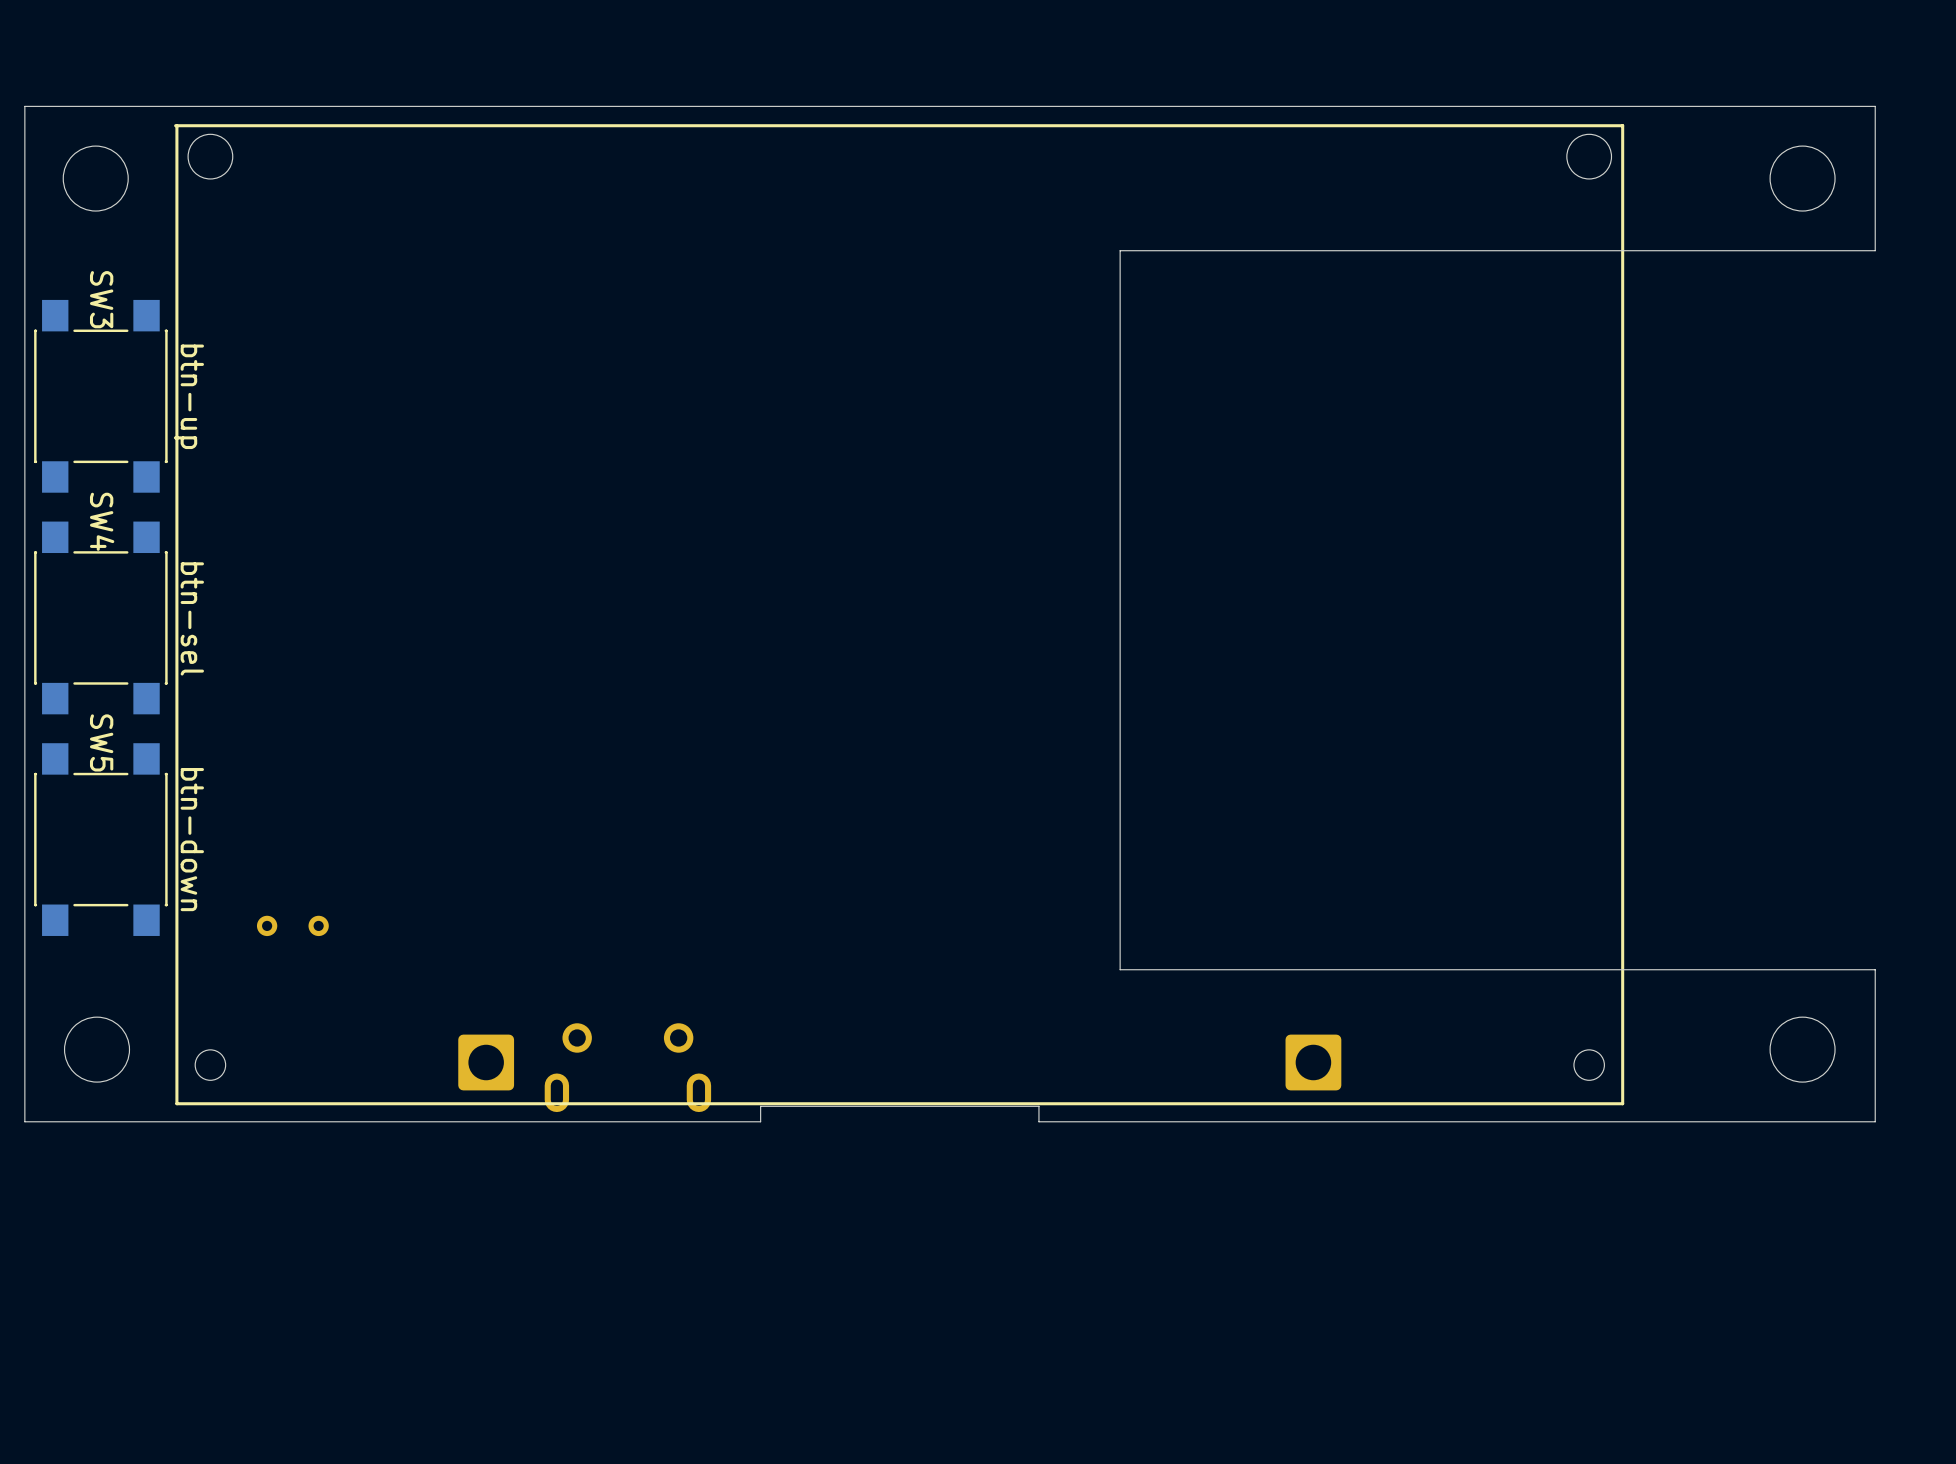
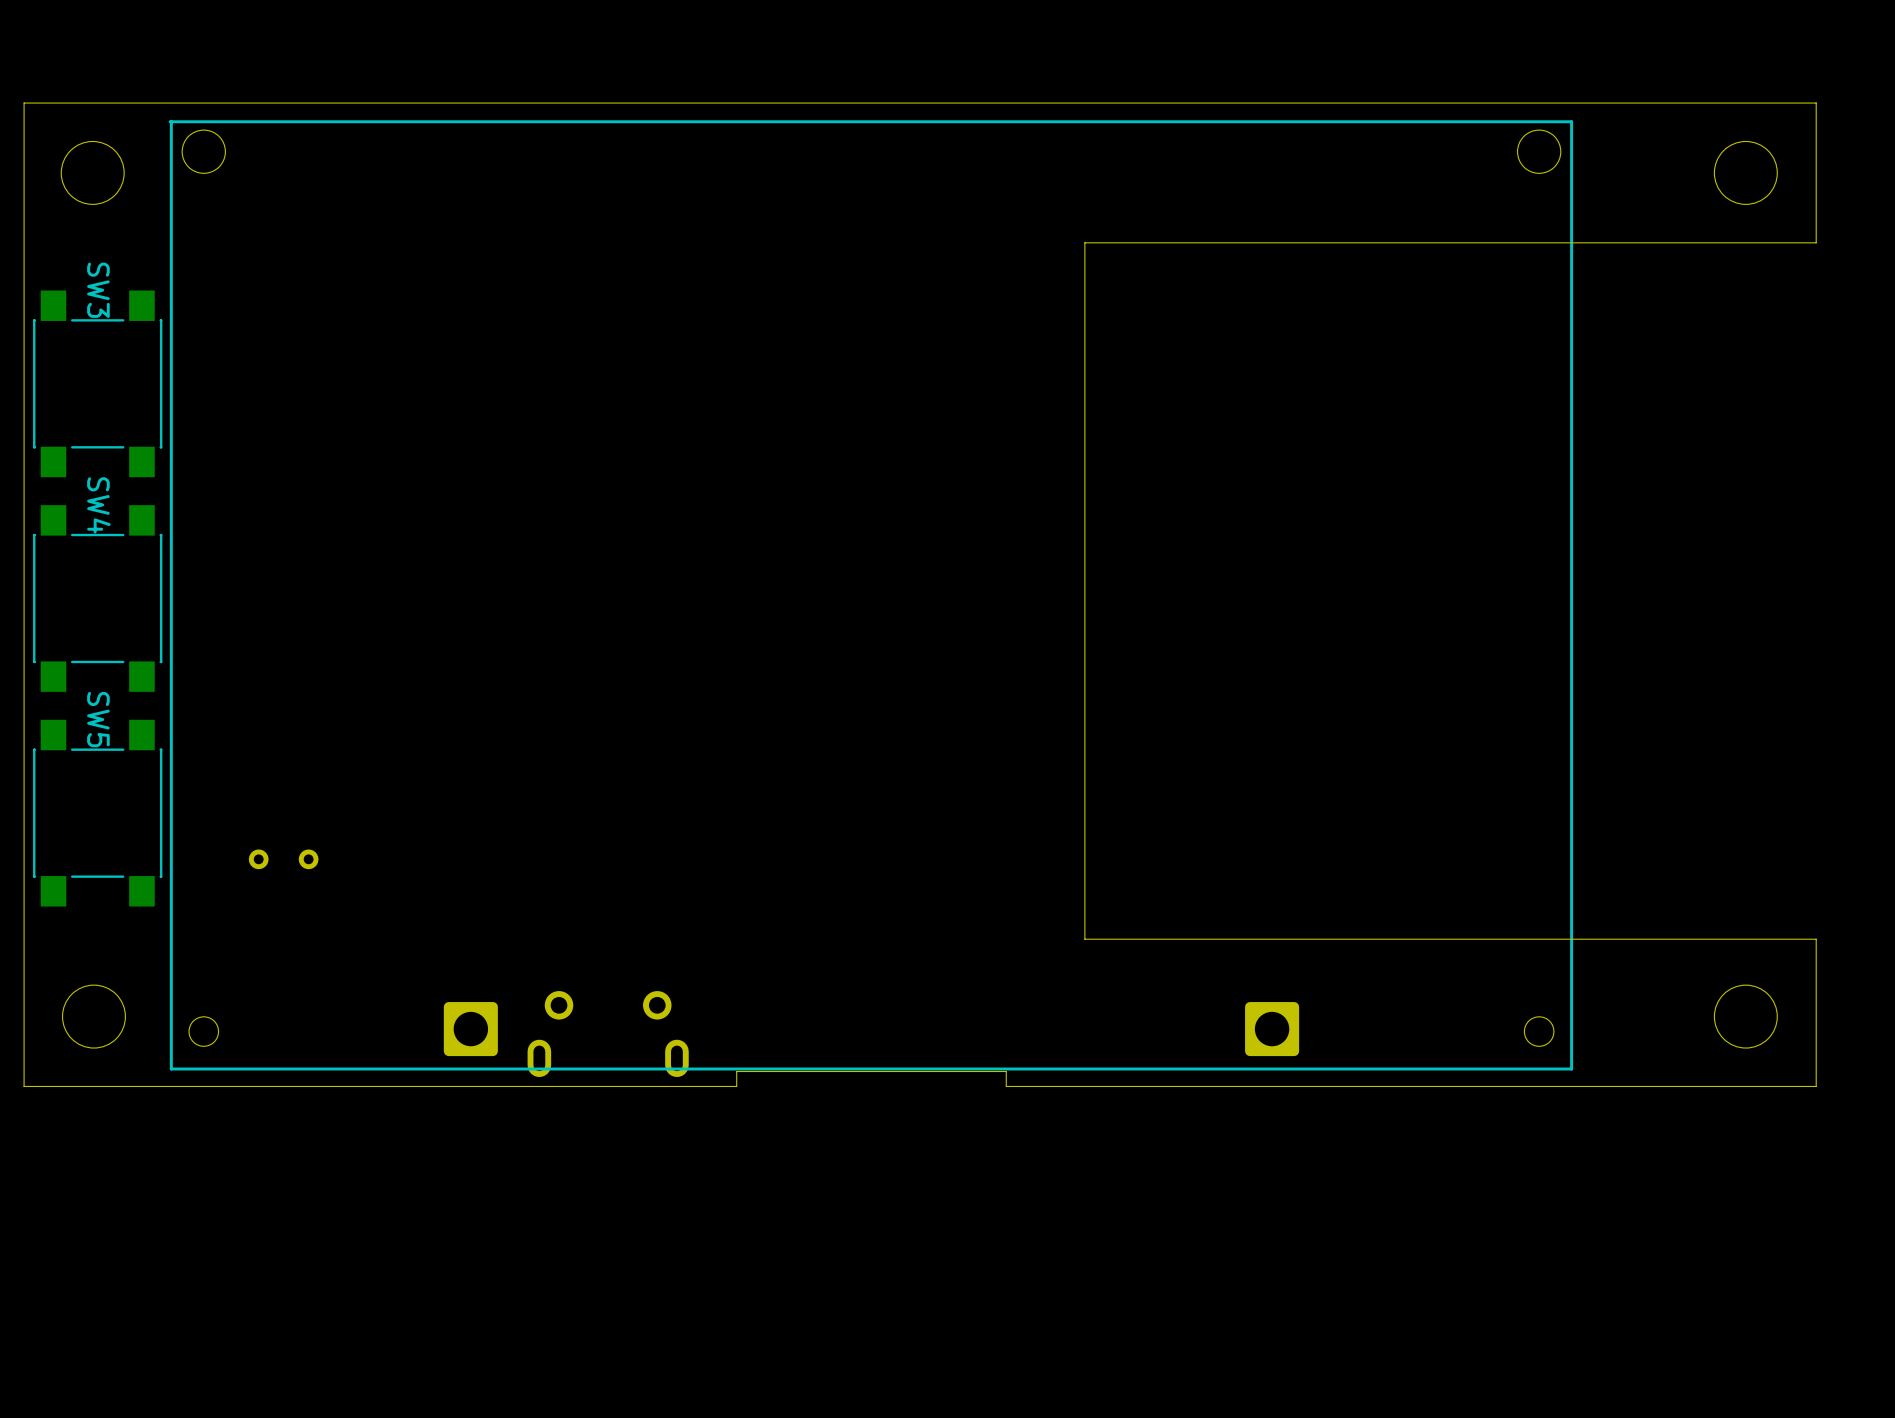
SW3 value: btn-up (188, 396) -> none
SW4 value: btn-sel (192, 618) -> none
SW5 value: btn-down (192, 839) -> none
part position: (292, 925) -> (283, 859)

